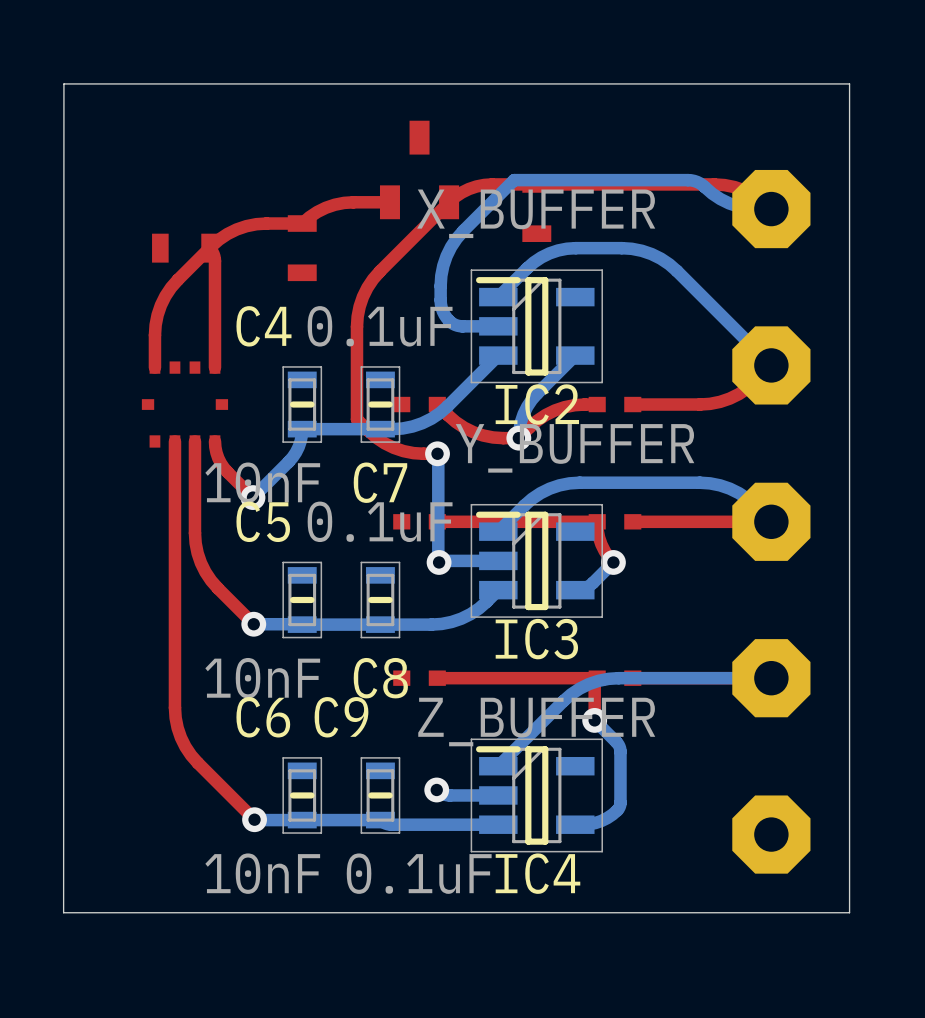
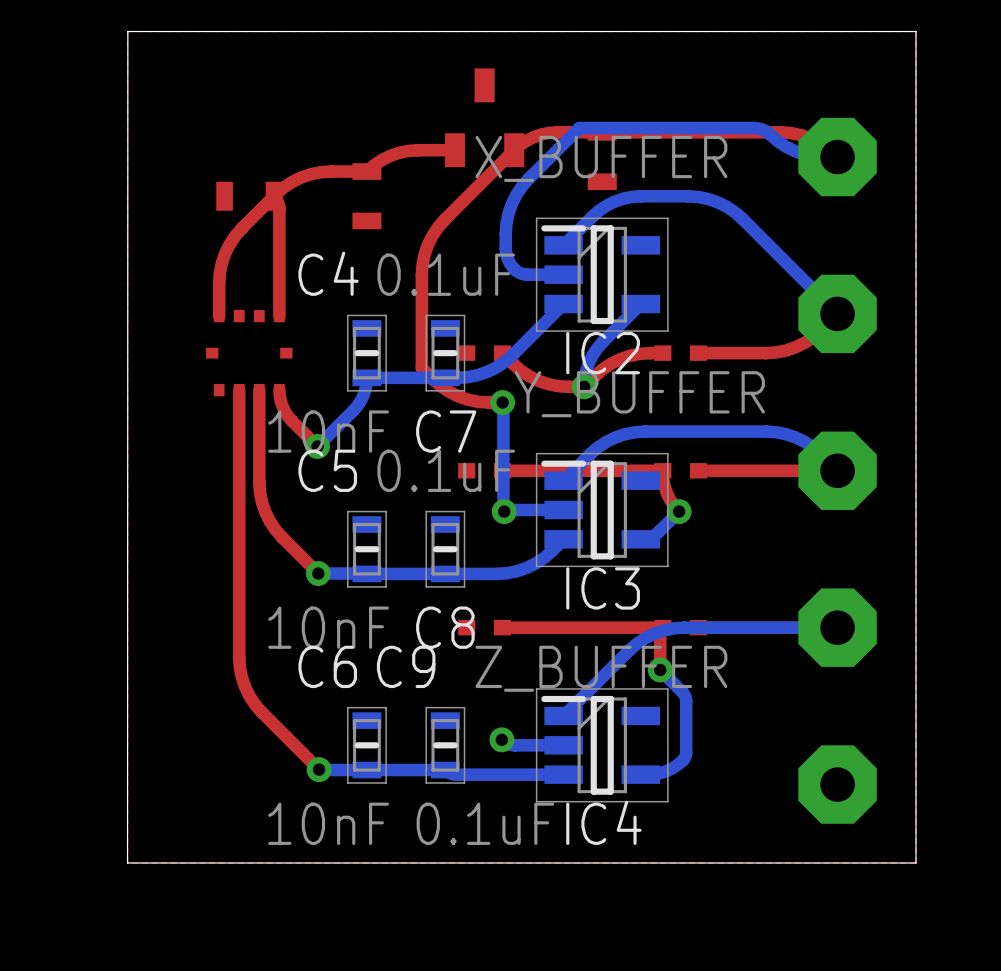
top zone outline: none -> (916, 31) (127, 31) (127, 862) (916, 862) (916, 31)

